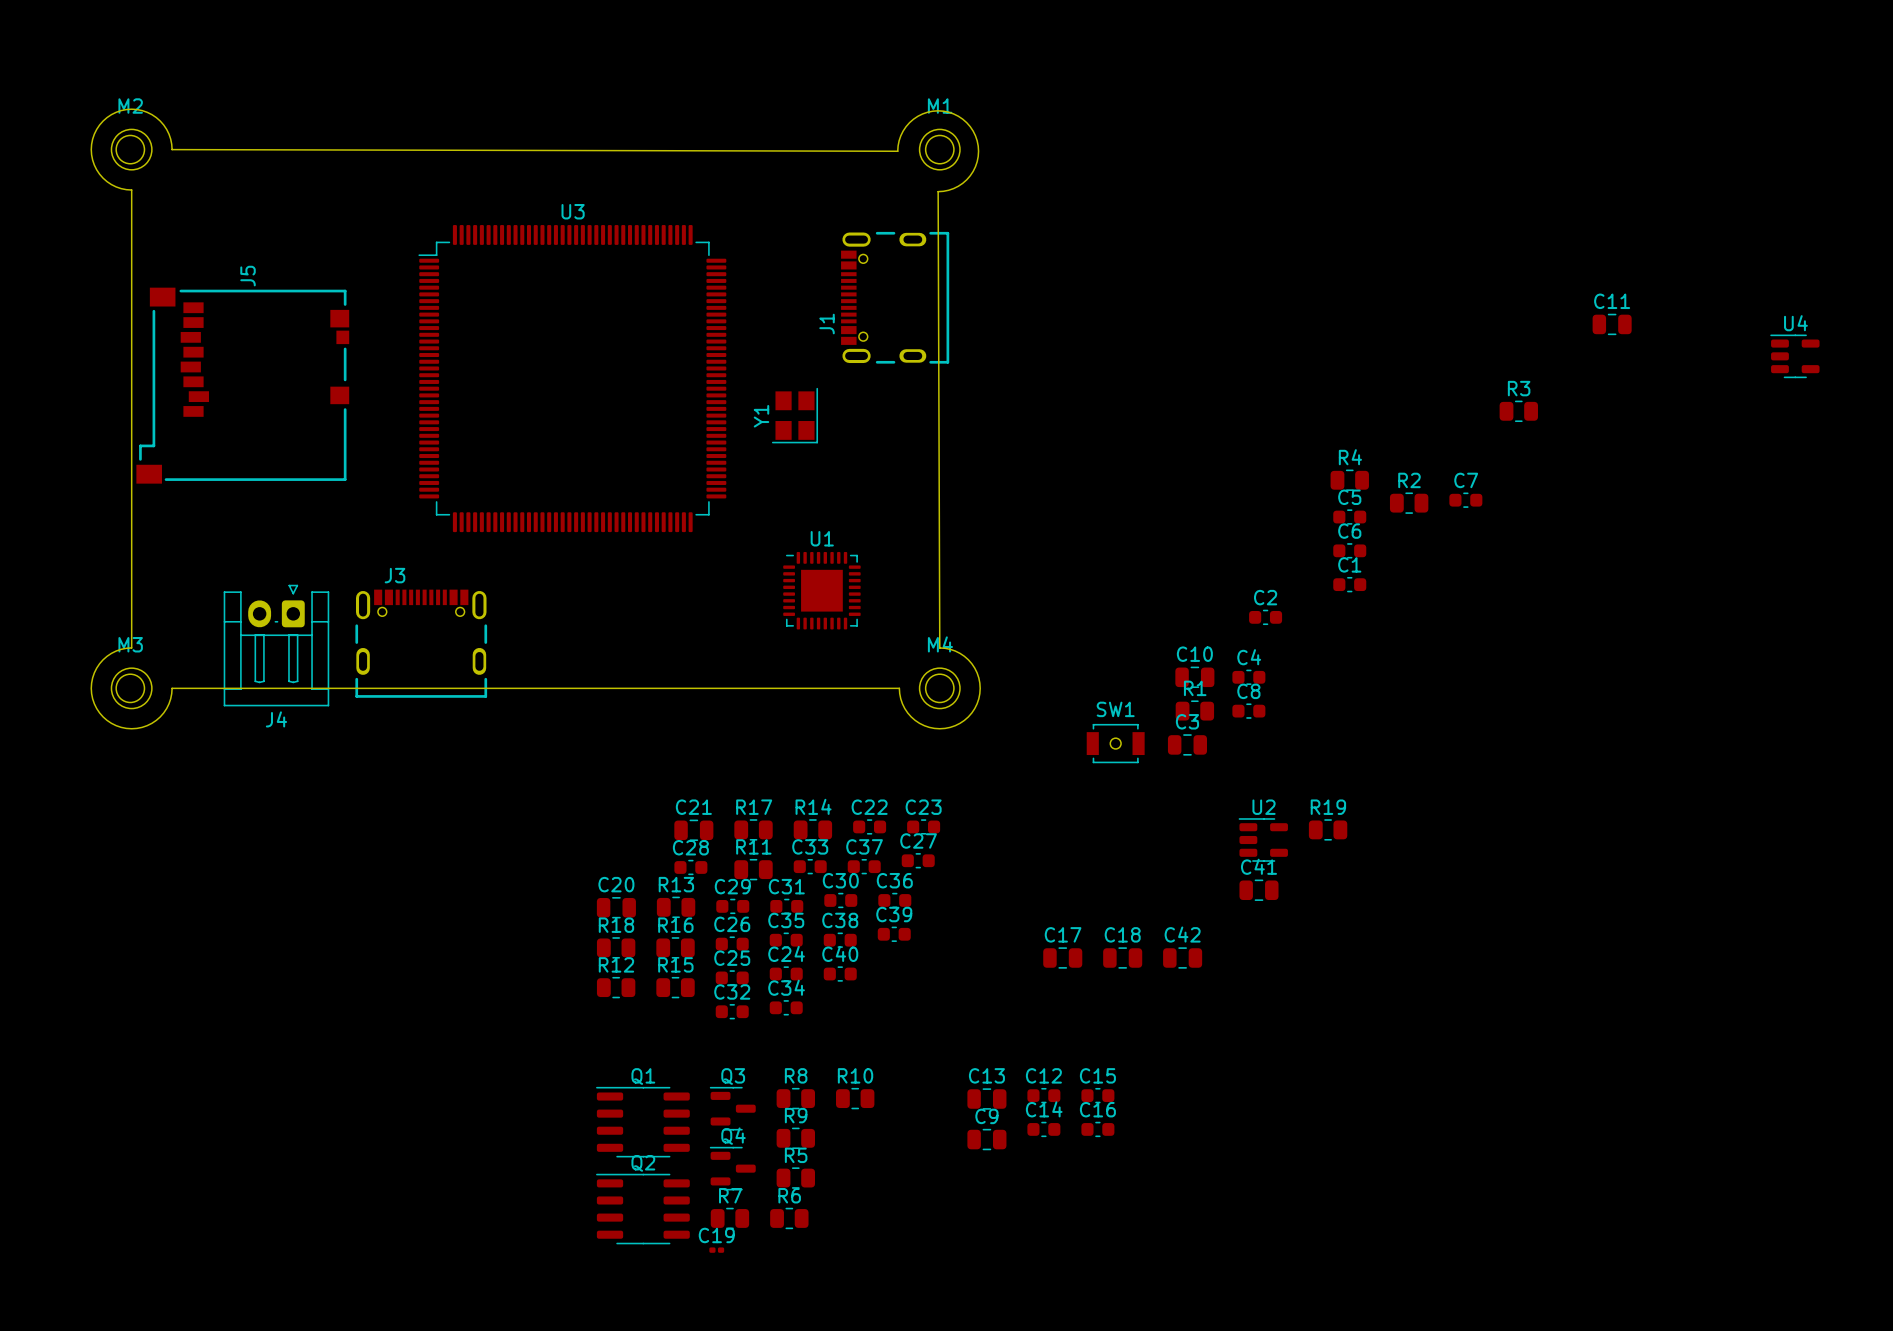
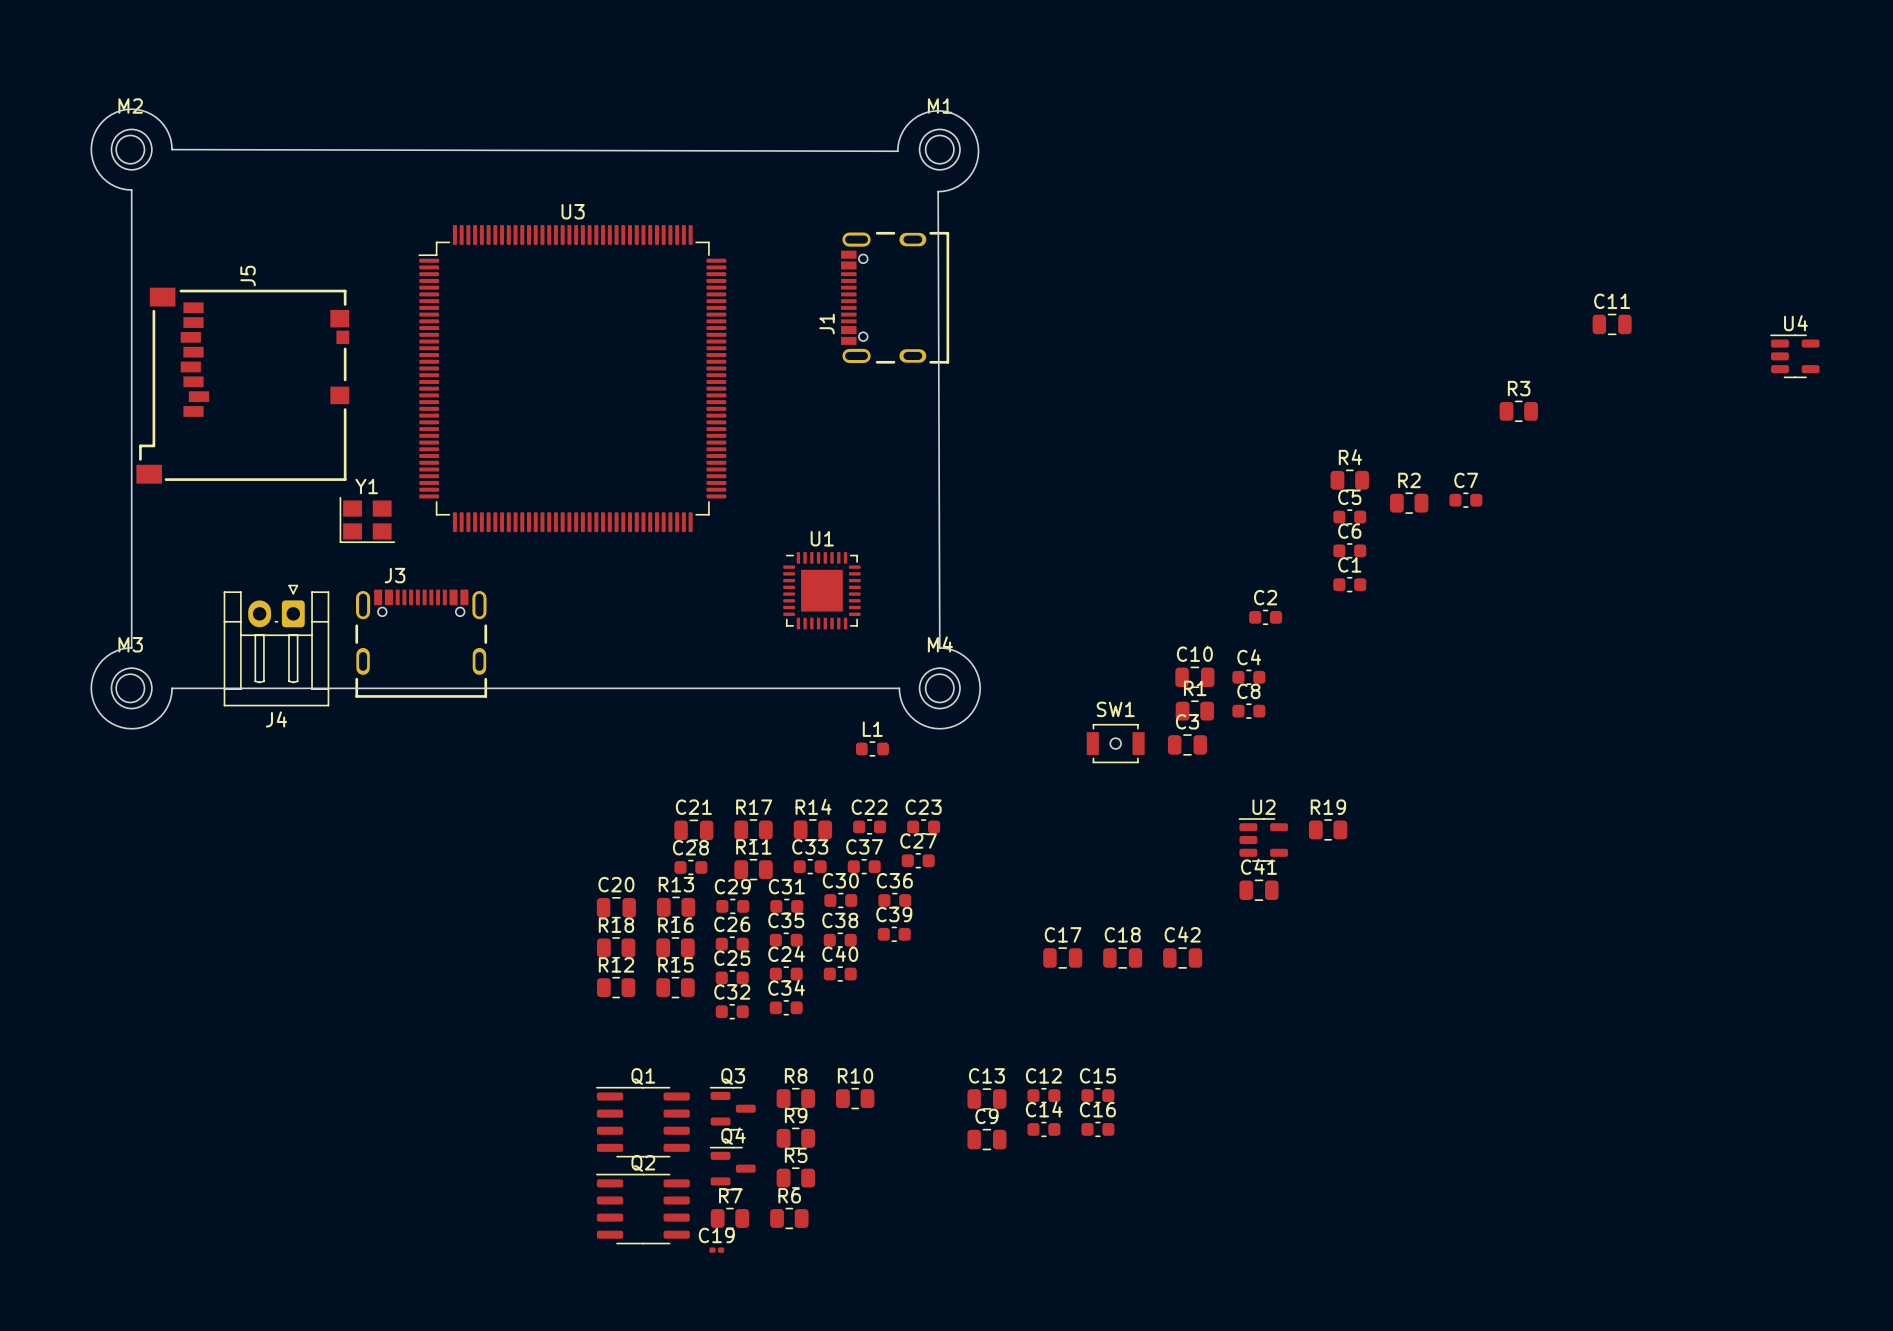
Y1 rotation: 0° (795, 415) -> 90° clockwise (367, 519)
Y1 position: (795, 415) -> (367, 519)
L1: none -> (872, 748)

